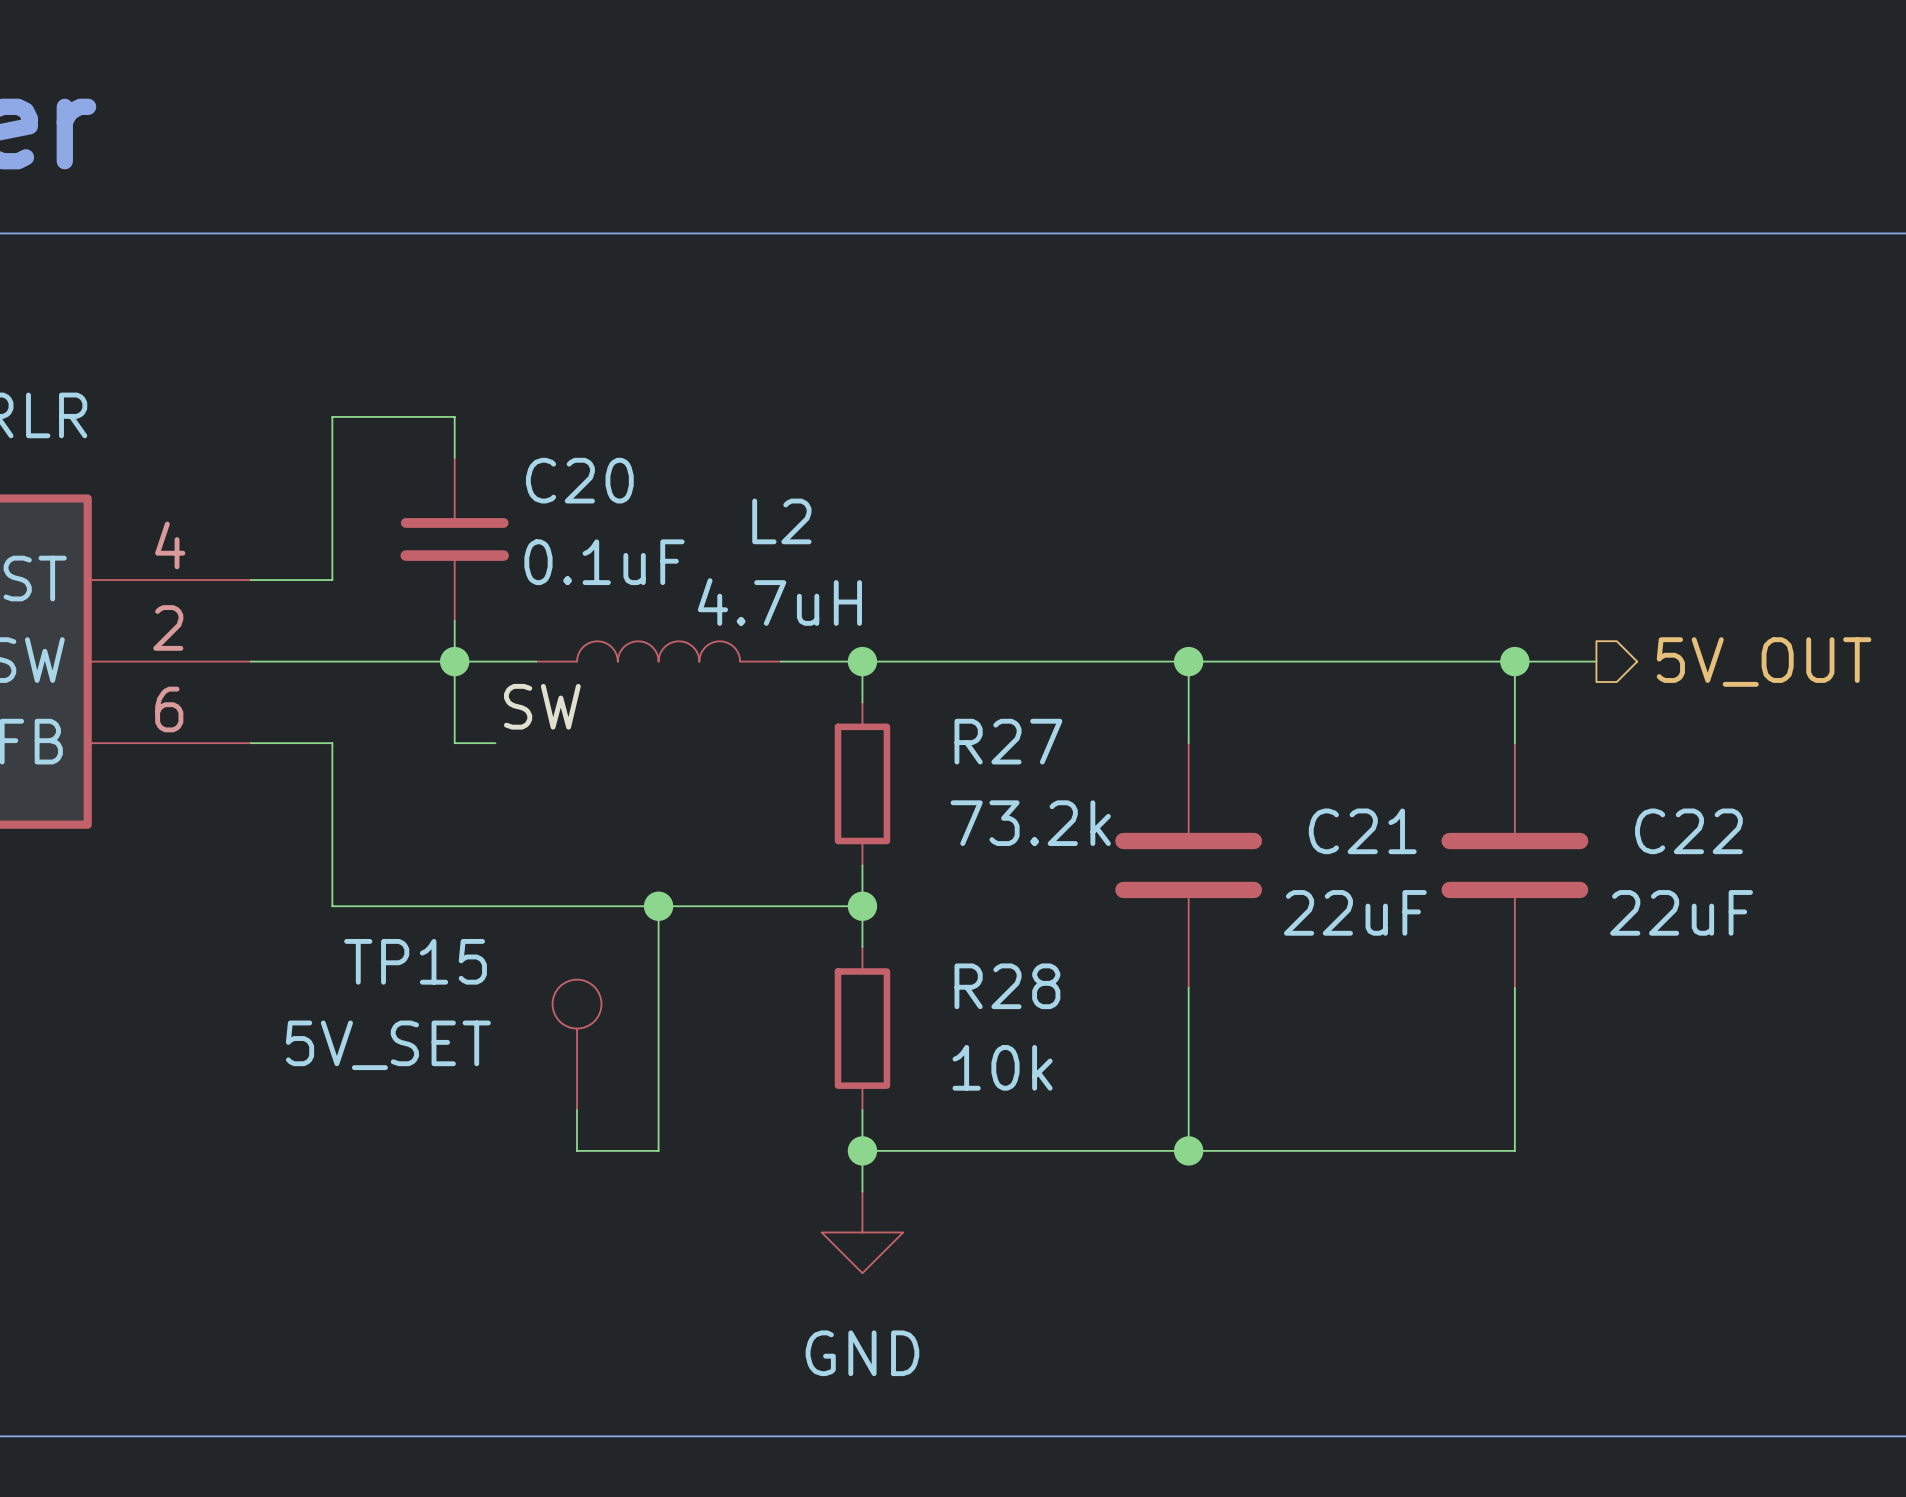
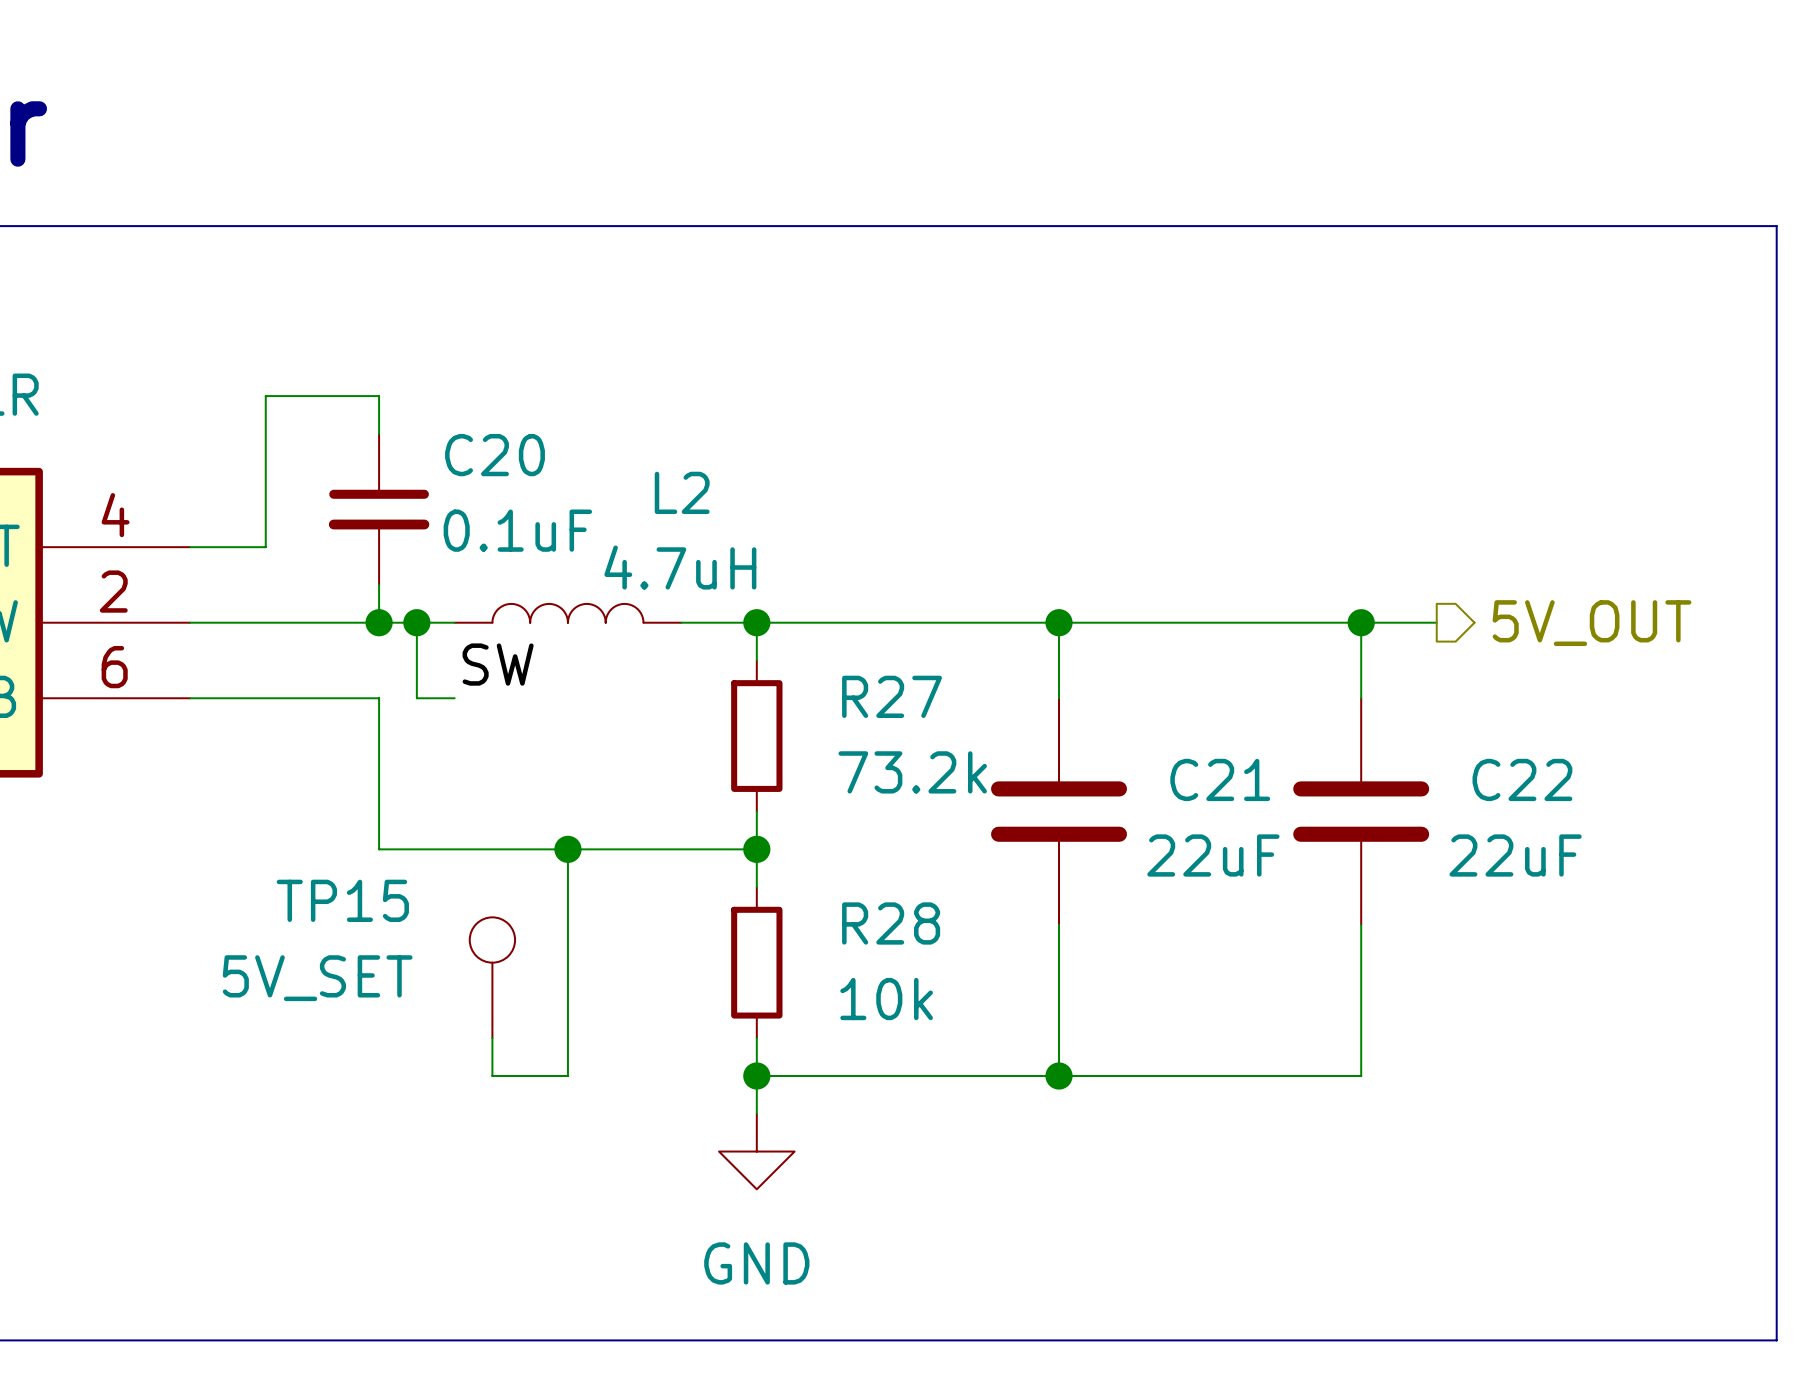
wire: (454, 661) (454, 743) (495, 743) -> (416, 622) (416, 698) (454, 698)
junction: none -> (416, 622)
label position: SW (542, 706) -> SW (498, 664)
wire: (332, 743) (332, 906) (454, 906) -> (265, 698) (379, 698) (379, 849)

